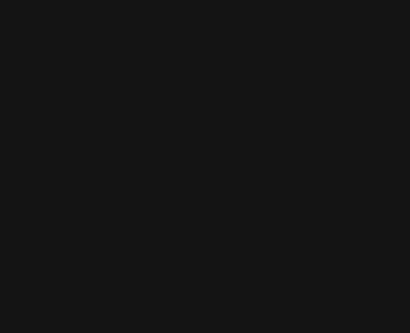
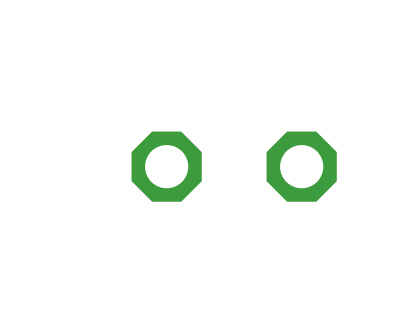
part: none -> (234, 166)

